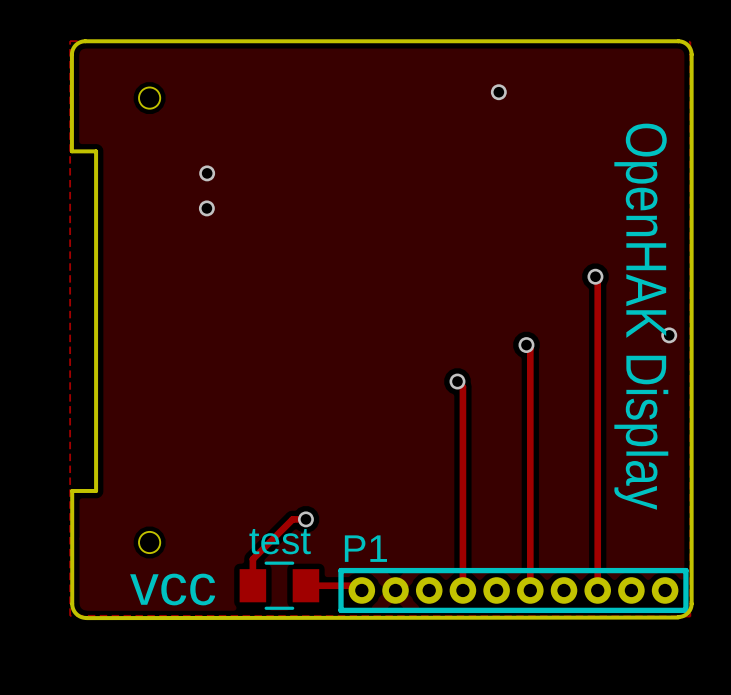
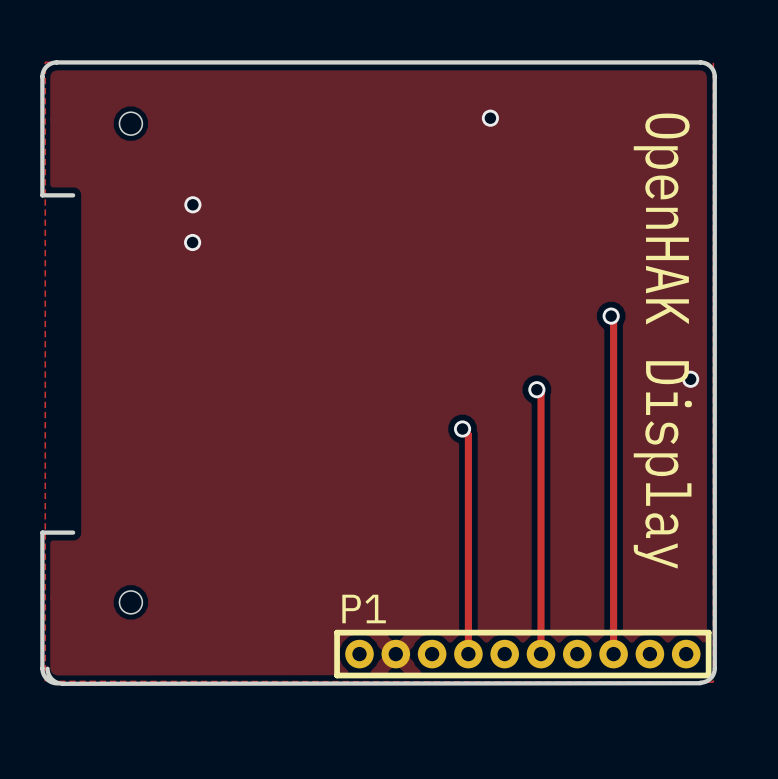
board edge: (85, 41) (77, 43) (72, 52) (71, 151) (95, 151) (96, 491) (72, 491) (72, 603) -> (61, 62) (49, 64) (42, 74) (42, 195) (73, 195)
via position: (498, 92) -> (490, 118)
text position: OpenHAK Display (641, 316) -> OpenHAK Display (662, 341)
board edge: none -> (73, 532) (42, 532) (42, 670) (46, 678) (57, 683)
track: (305, 519) (292, 519) (252, 559) (252, 585) -> none
via: (305, 519) -> none
test: (279, 585) -> none
track: (305, 585) (357, 585) (361, 590) -> none
text: vcc (172, 589) -> none

